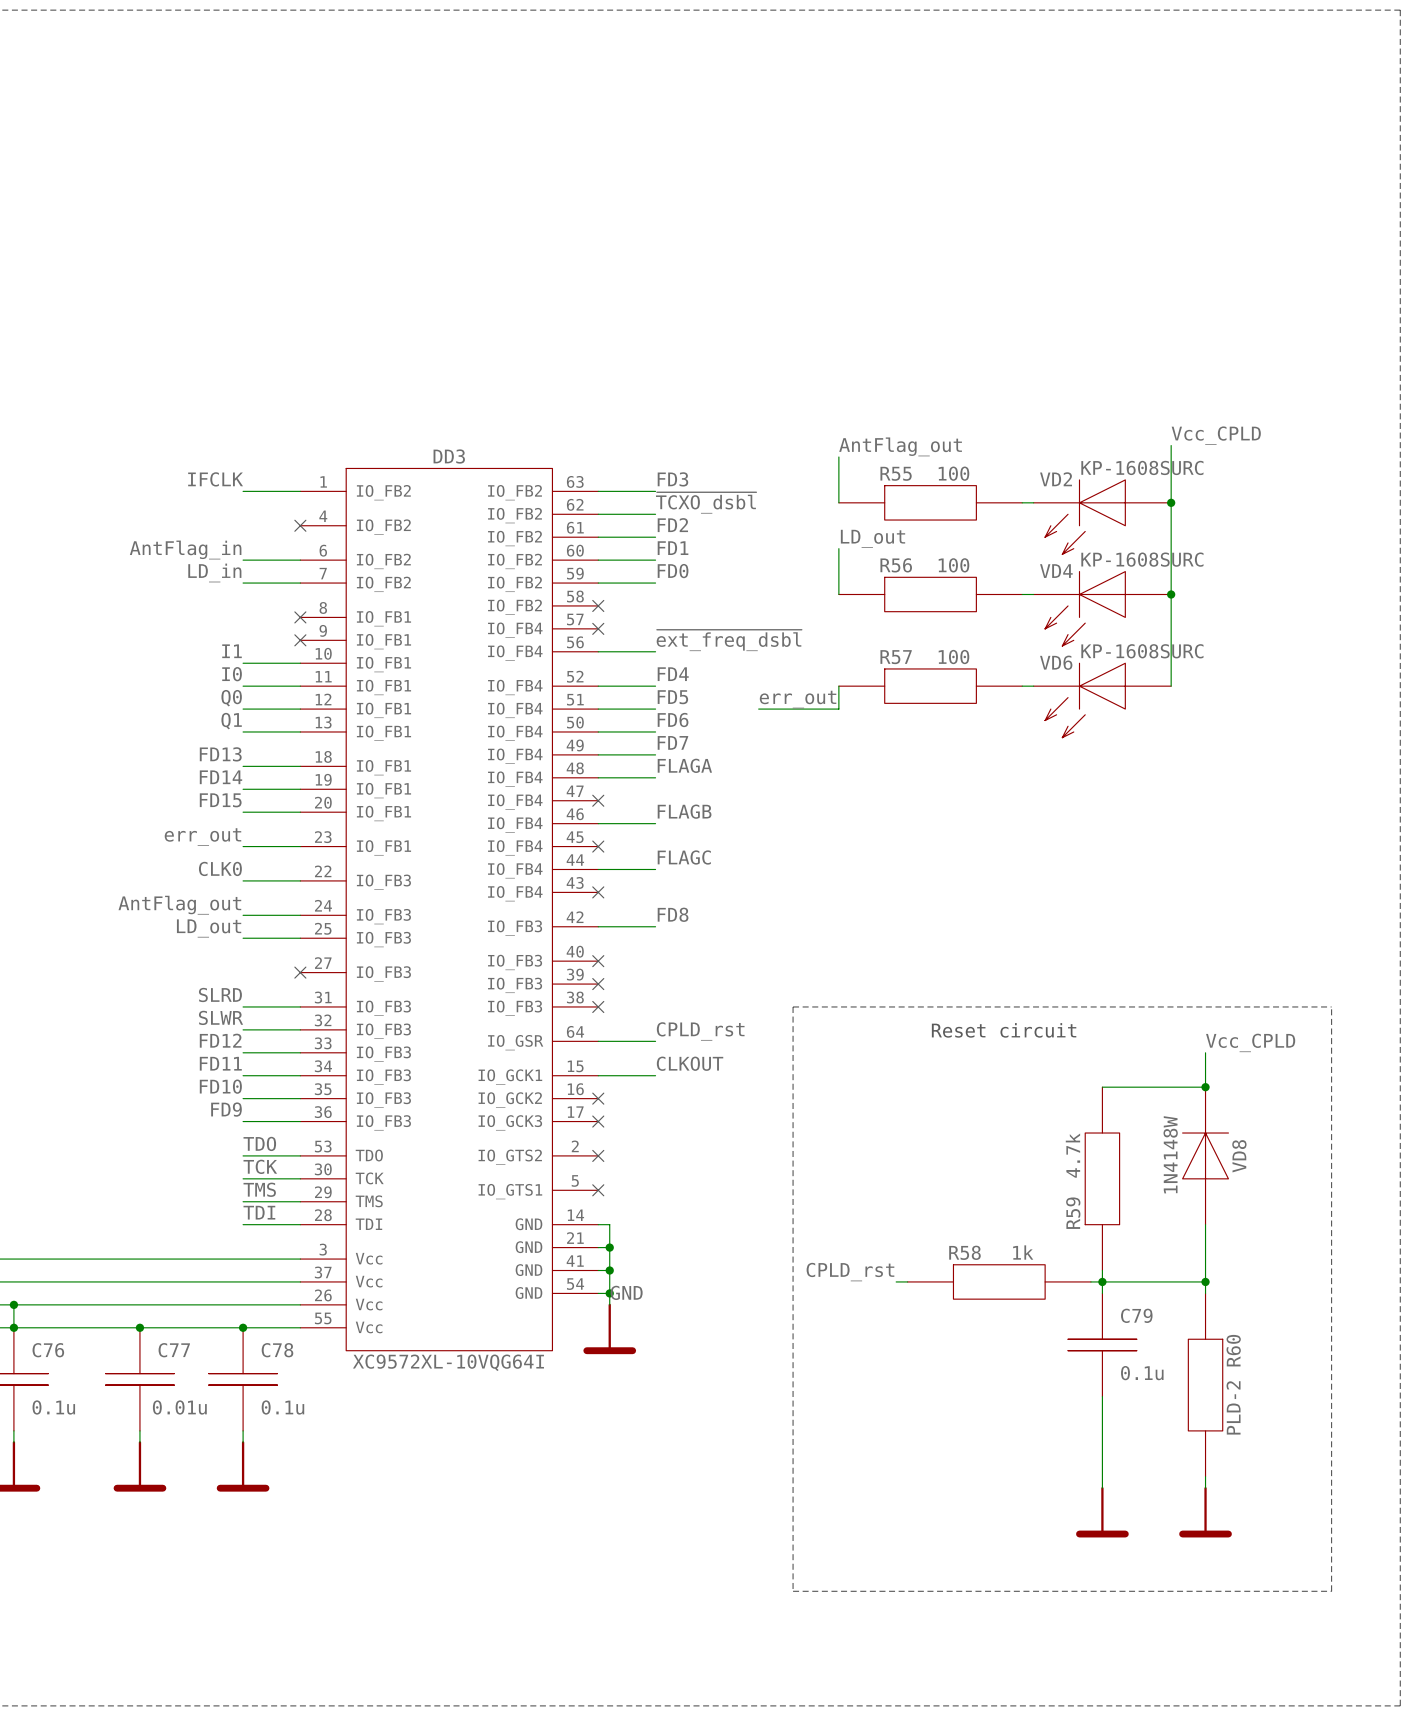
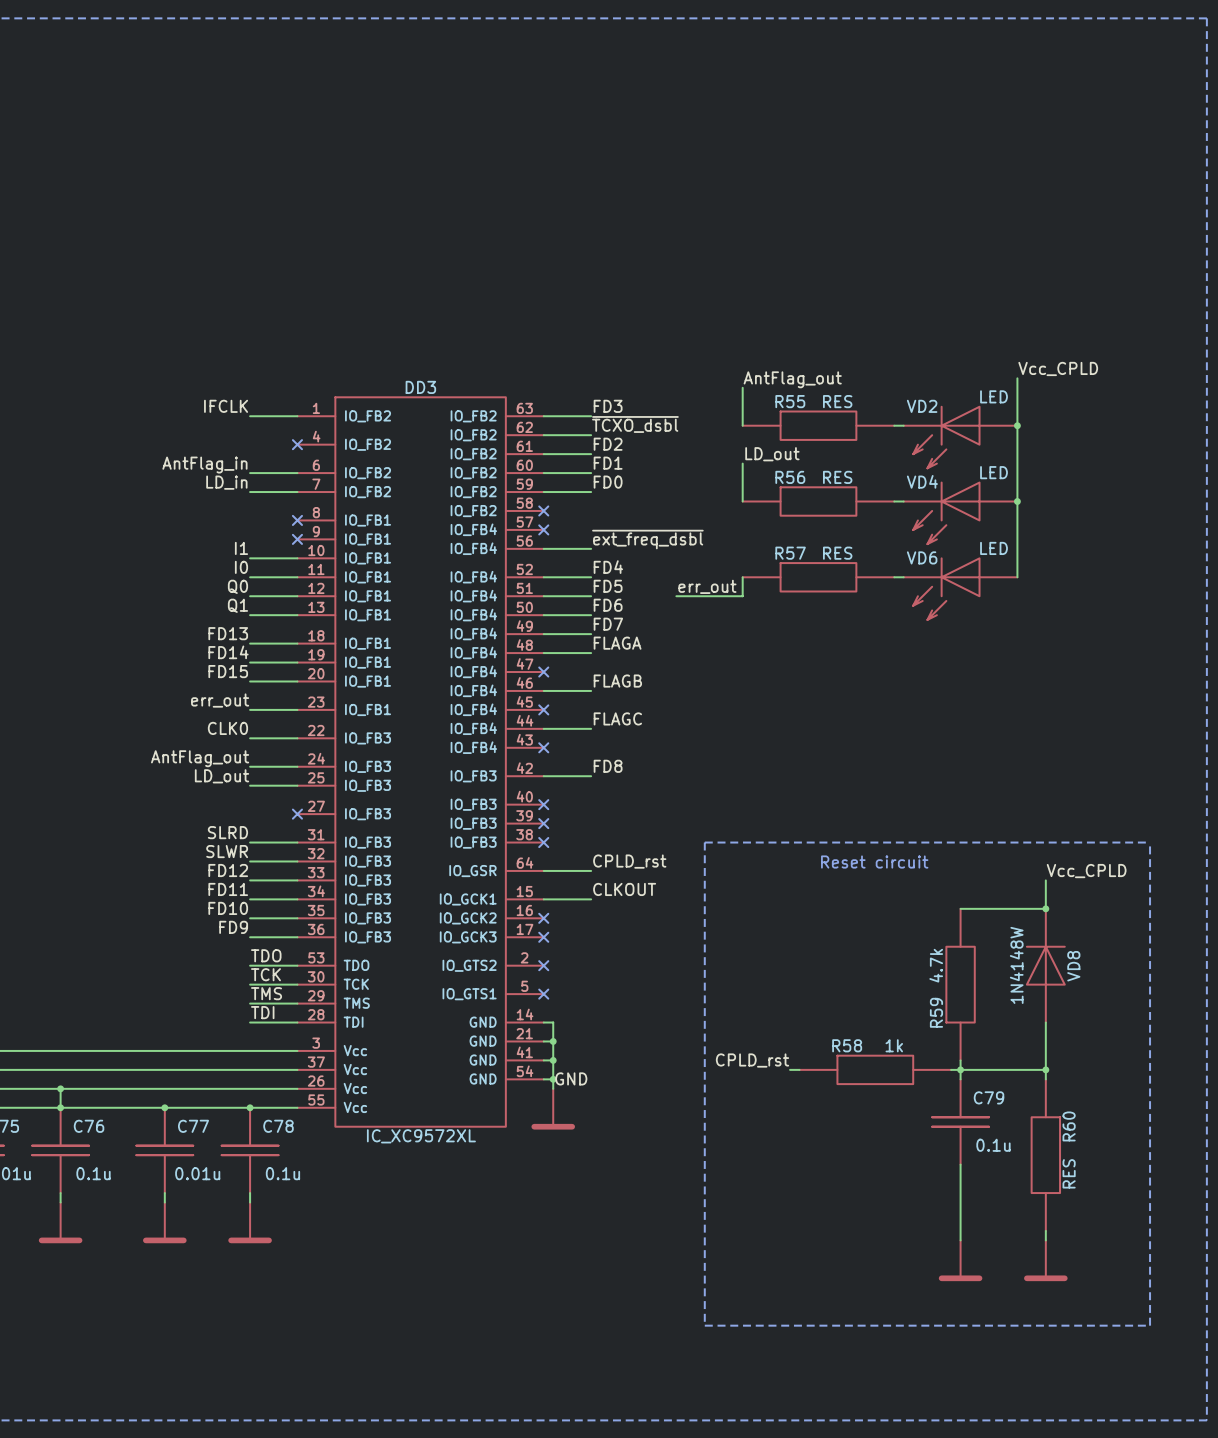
VD2 value: KP-1608SURC (1142, 467) -> LED (994, 396)
R55 value: 100 (953, 473) -> RES (837, 401)
VD4 value: KP-1608SURC (1142, 559) -> LED (994, 472)
R56 value: 100 (953, 565) -> RES (837, 477)
VD6 value: KP-1608SURC (1142, 651) -> LED (994, 548)
R57 value: 100 (953, 657) -> RES (837, 553)
DD3 value: XC9572XL-10VQG64I (448, 1362) -> IC_XC9572XL (421, 1136)
R60 value: PLD-2 (1233, 1407) -> RES (1069, 1173)

